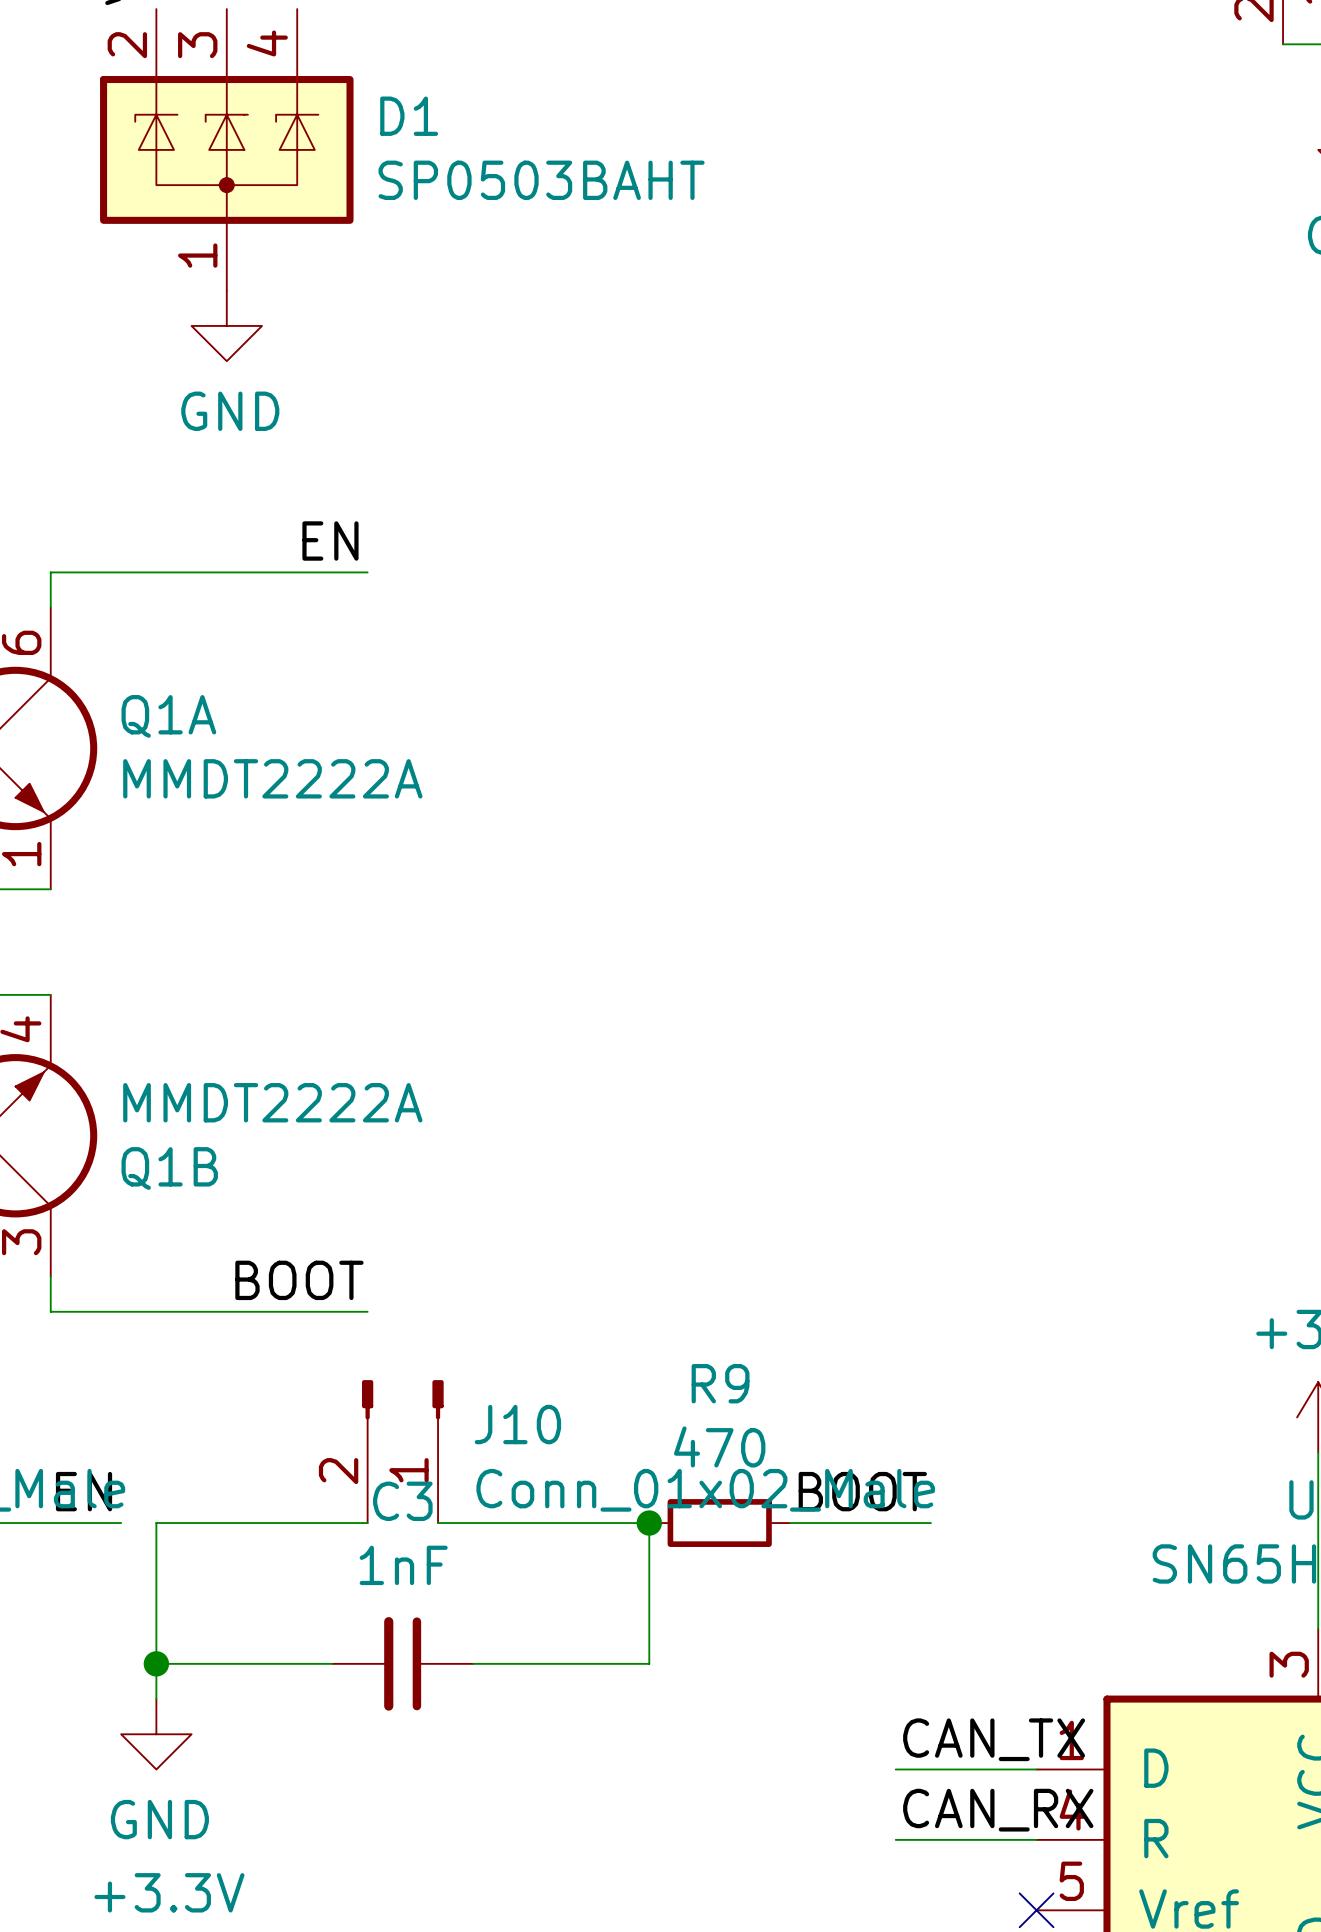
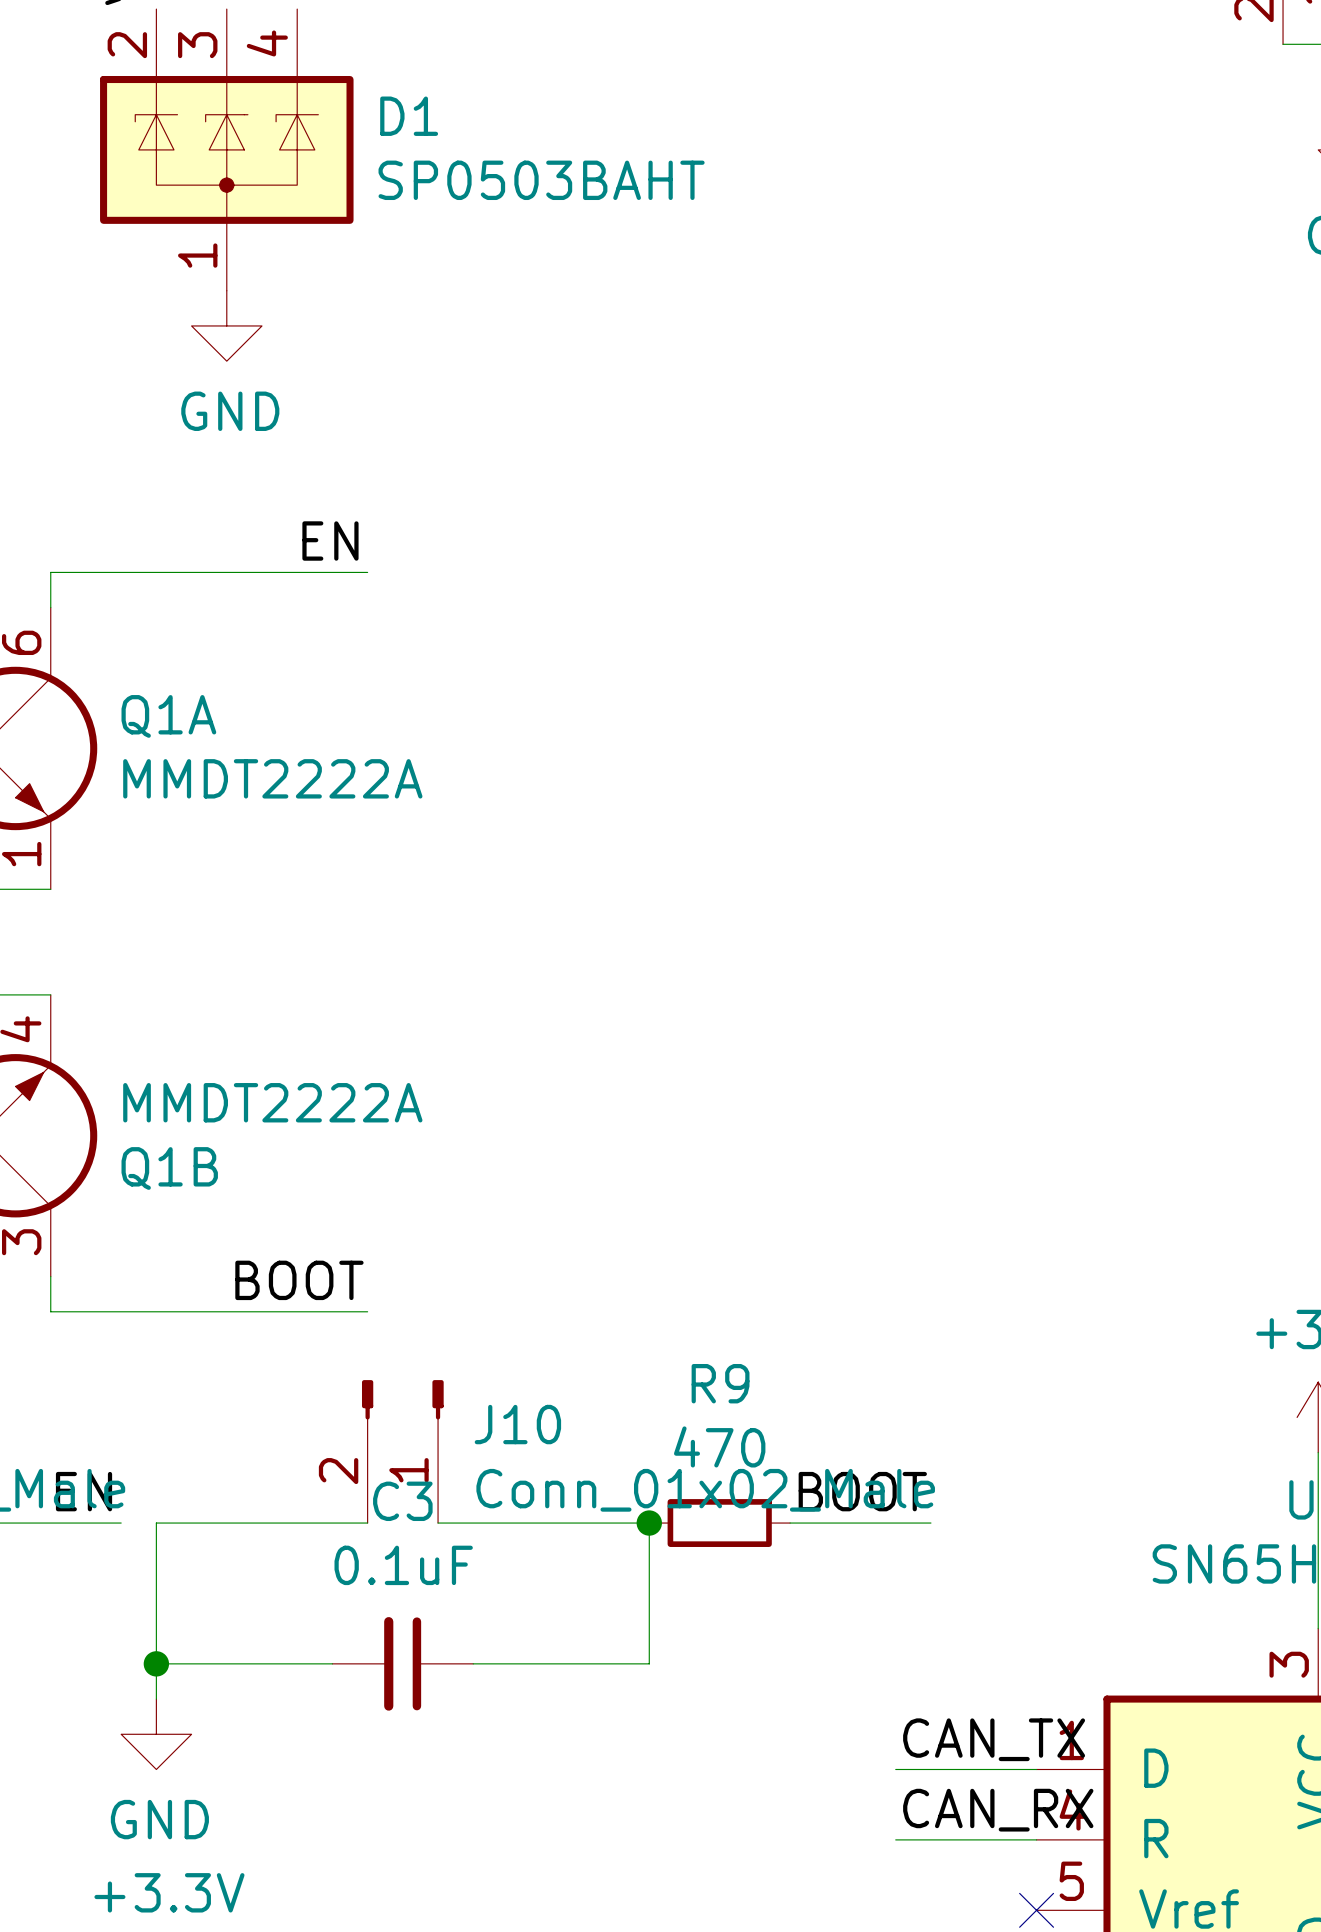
C3 value: 1nF (403, 1565) -> 0.1uF (403, 1565)

